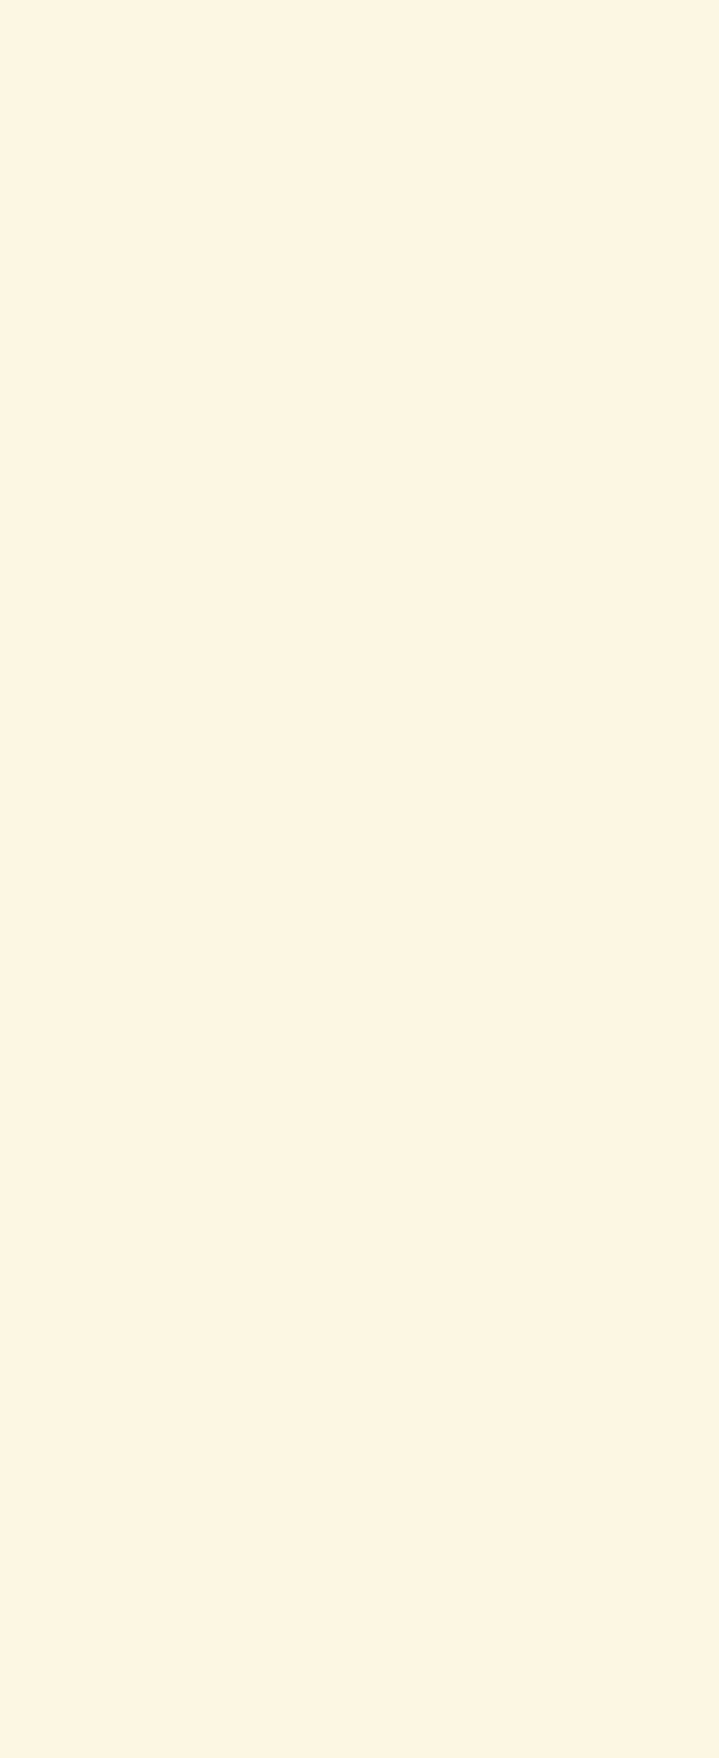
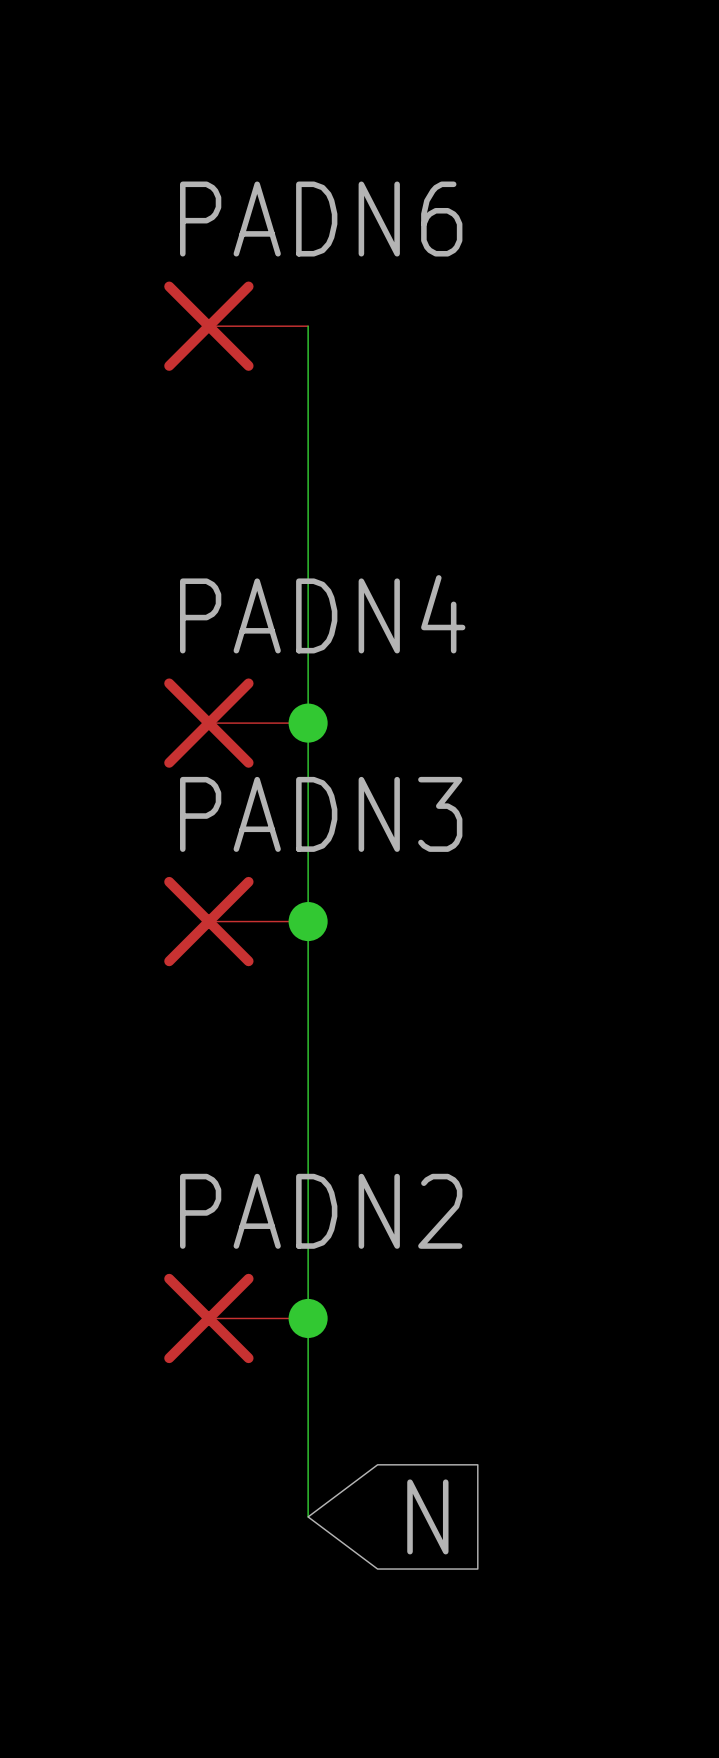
PADN6: none -> (236, 326)
wire: none -> (308, 326) (308, 1516)
PADN4: none -> (236, 723)
junction: none -> (308, 723)
PADN3: none -> (236, 921)
junction: none -> (308, 921)
PADN2: none -> (236, 1318)
junction: none -> (308, 1318)
global label: none -> N (427, 1516)

